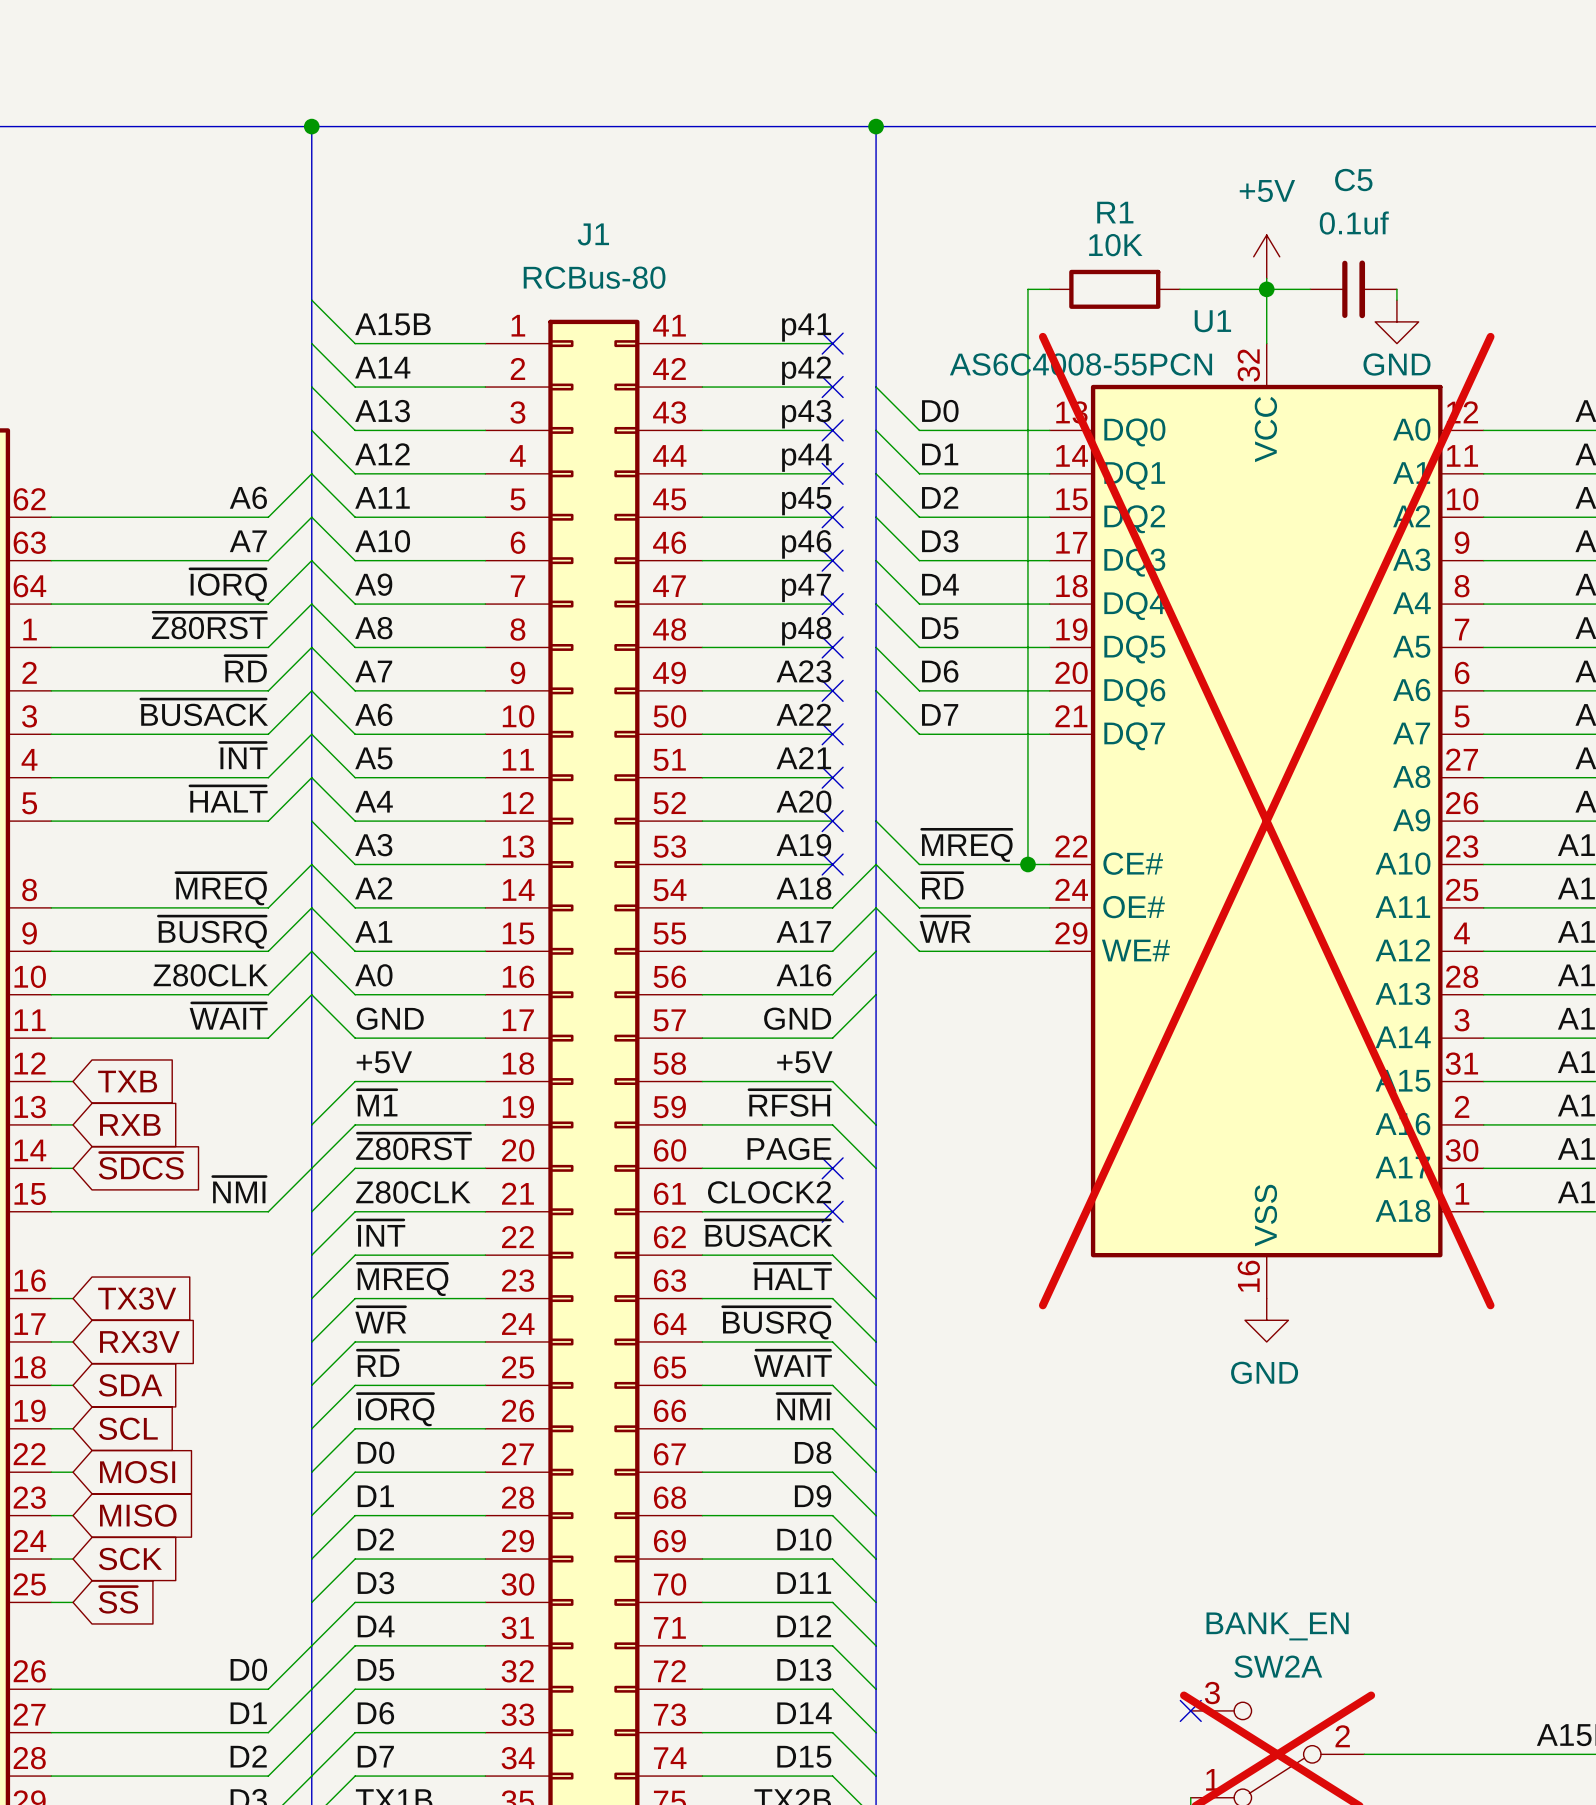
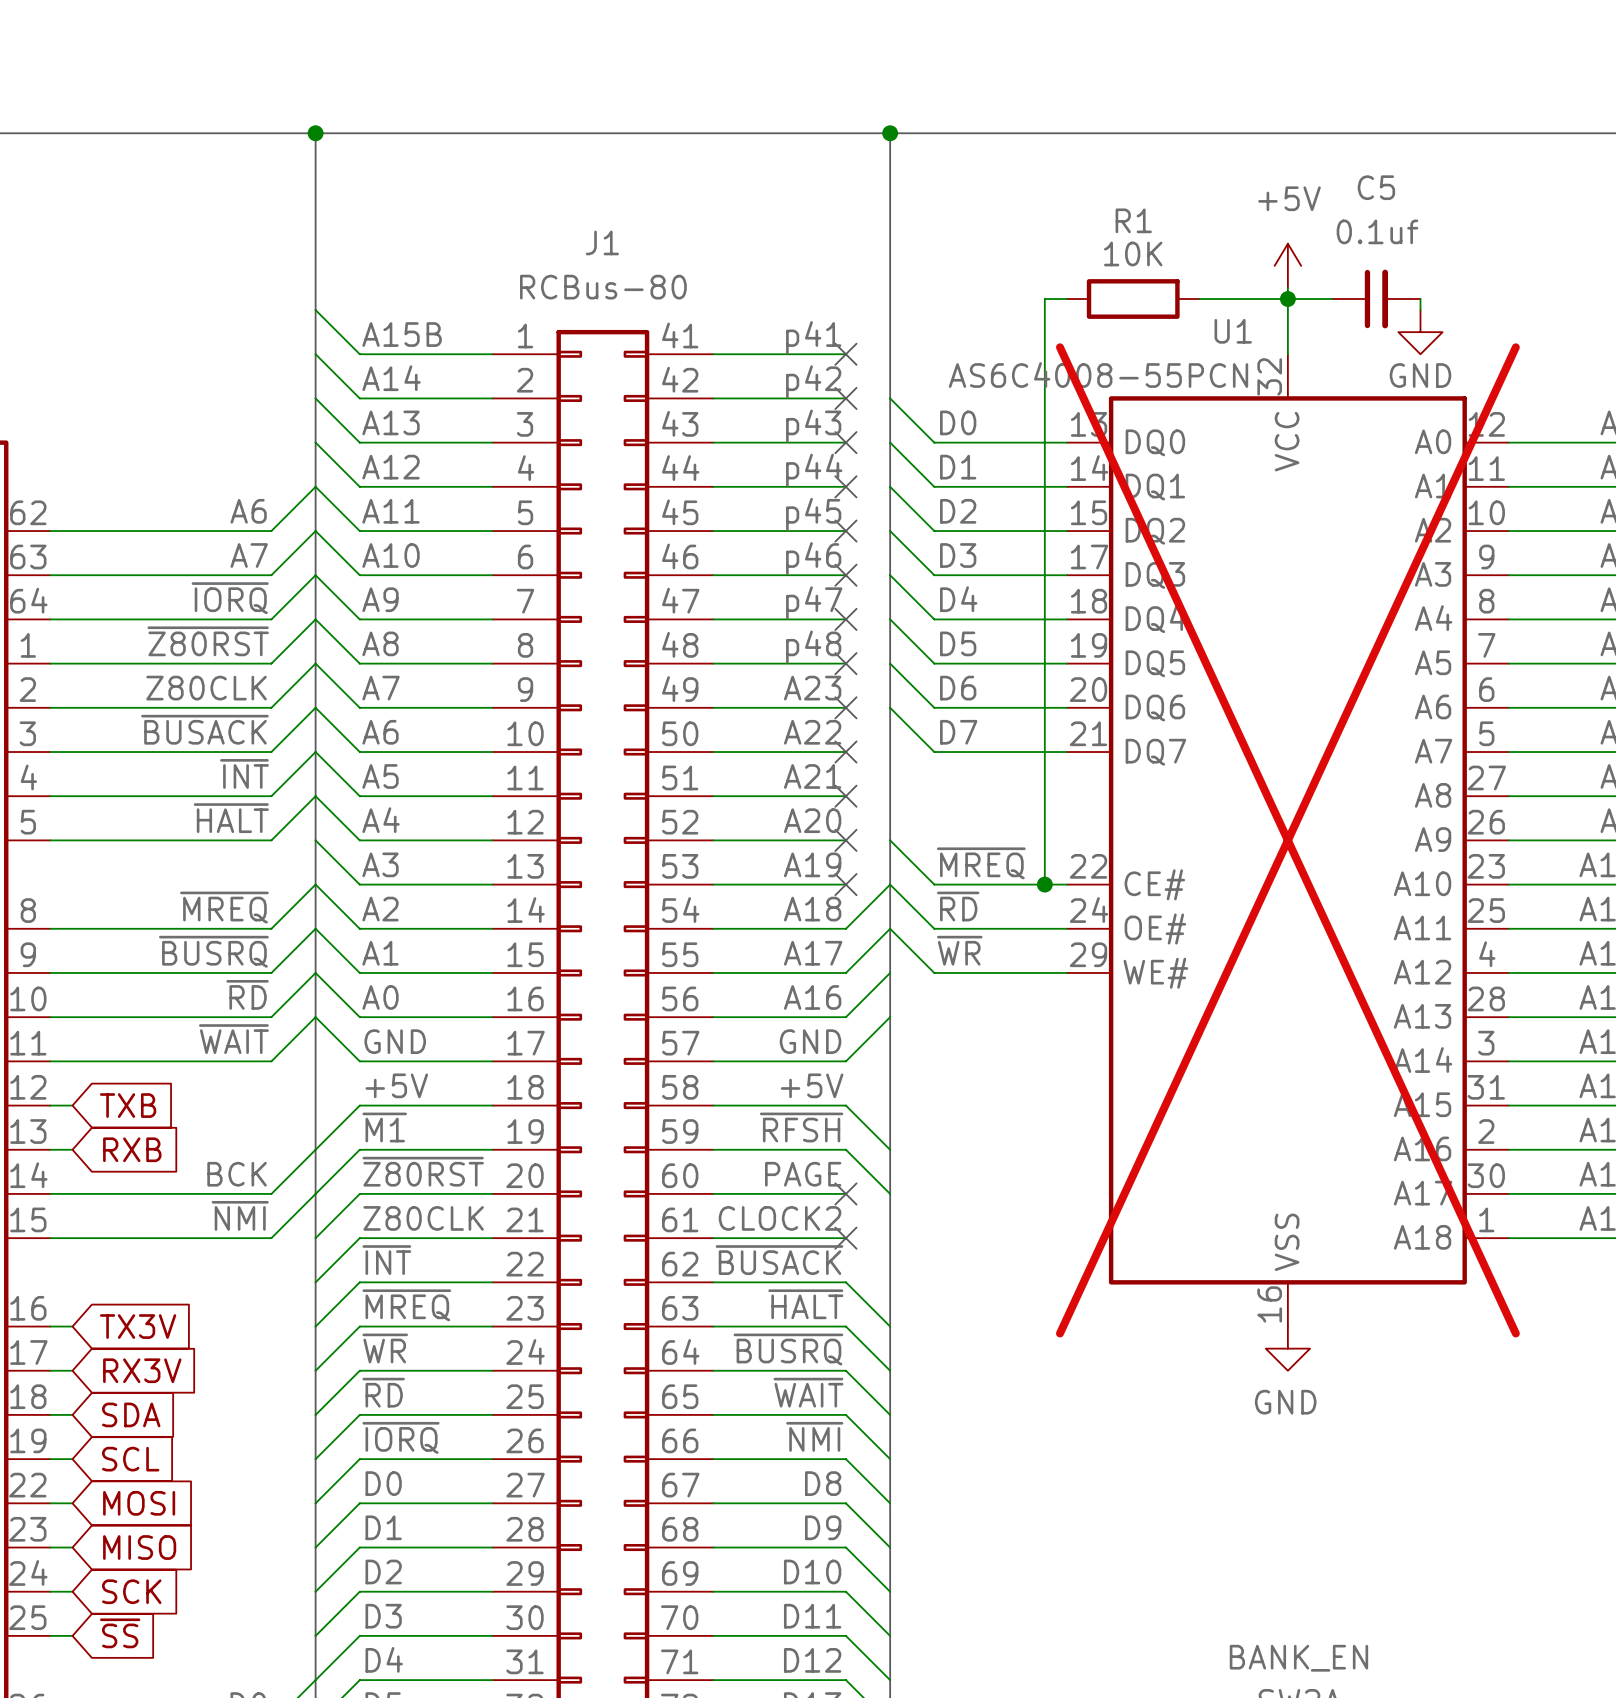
label: ~{RD} (245, 669) -> Z80CLK (206, 688)
label: Z80CLK (210, 975) -> ~{RD} (247, 994)
wire: none -> (315, 1149) (271, 1193) (72, 1193)
label: none -> BCK (237, 1174)
global label: ~{SDCS} (141, 1166) -> none

